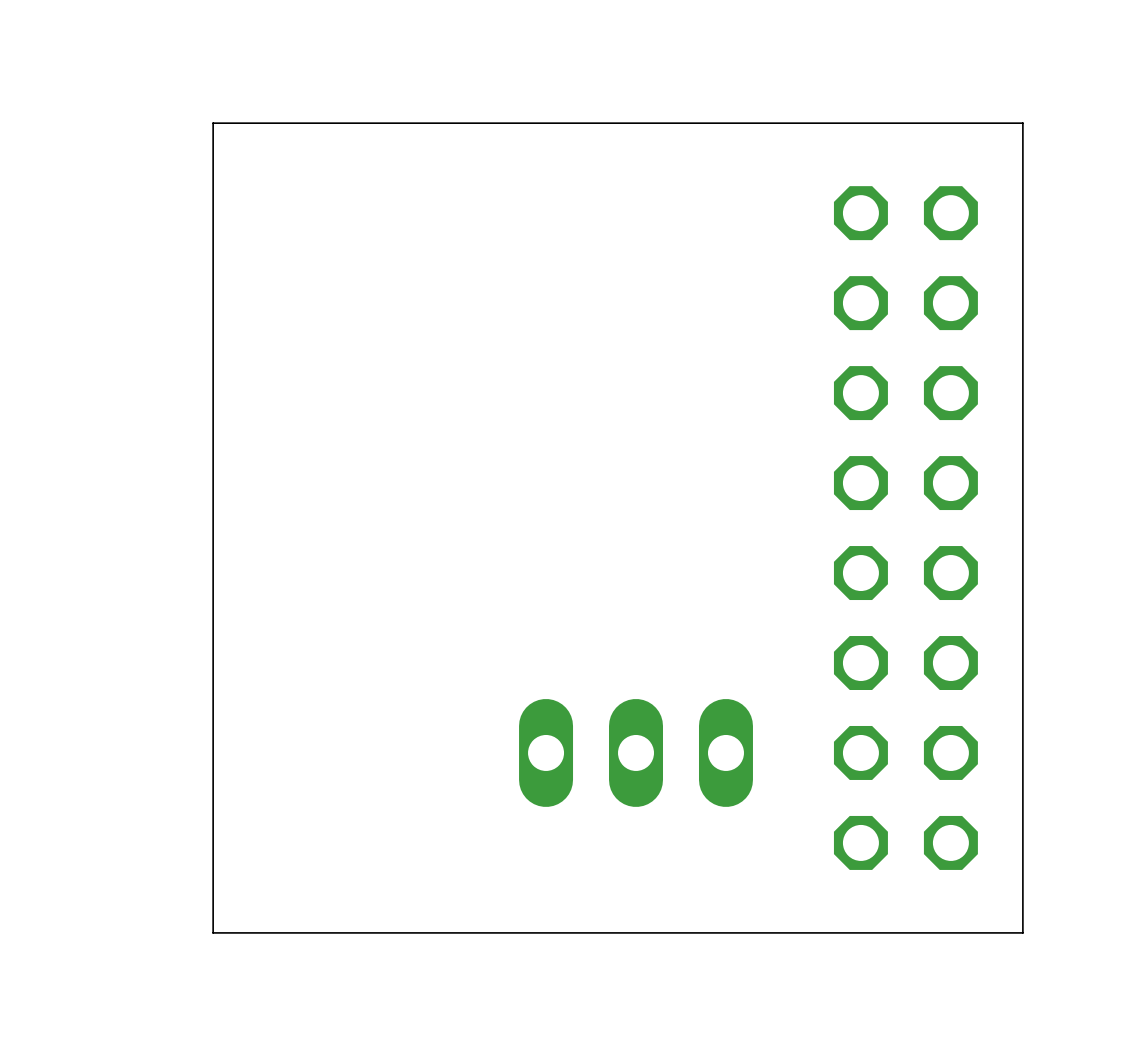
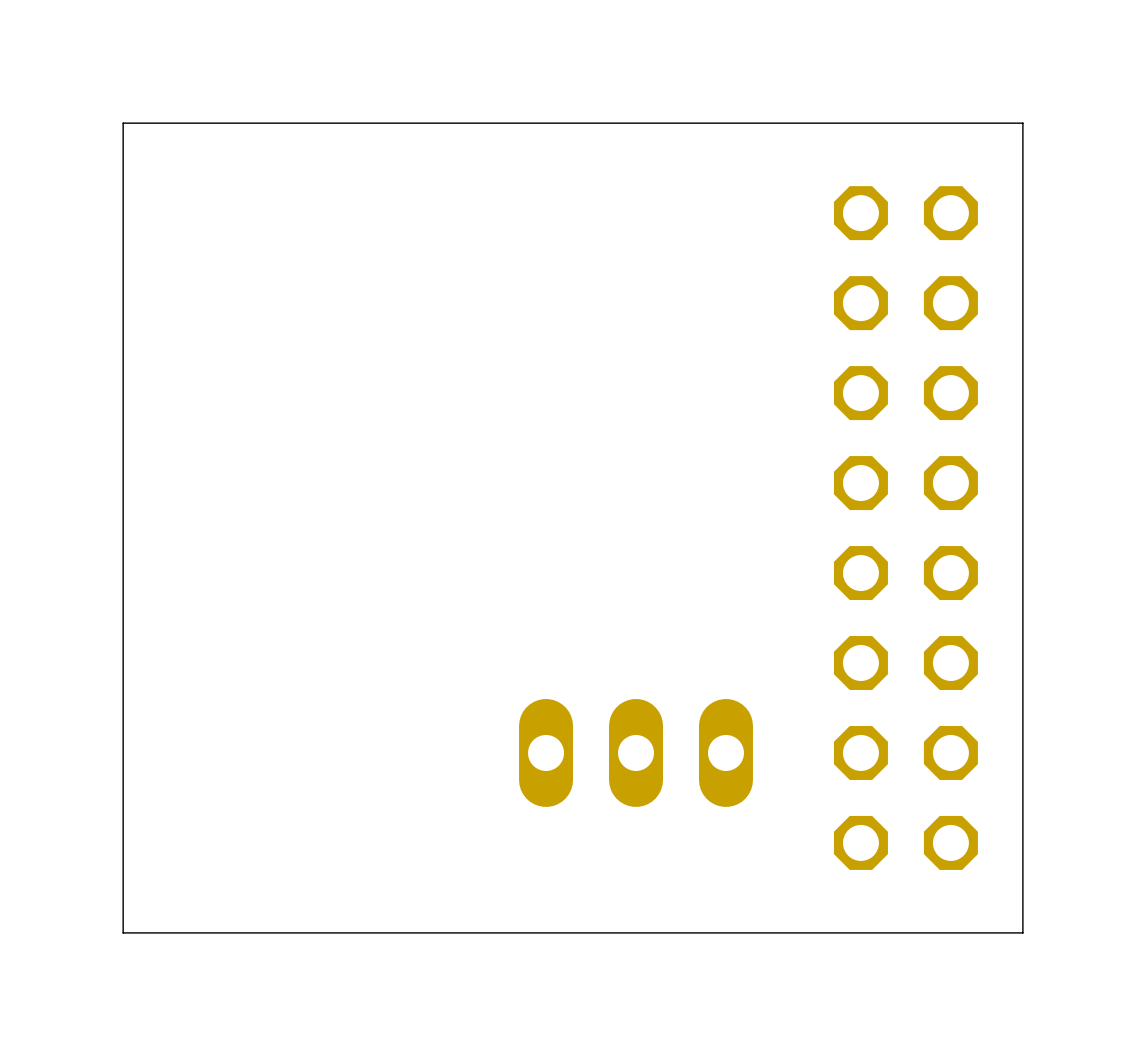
board edge: (213, 123) (213, 932) -> (213, 123) (123, 123) (123, 932) (213, 932)

